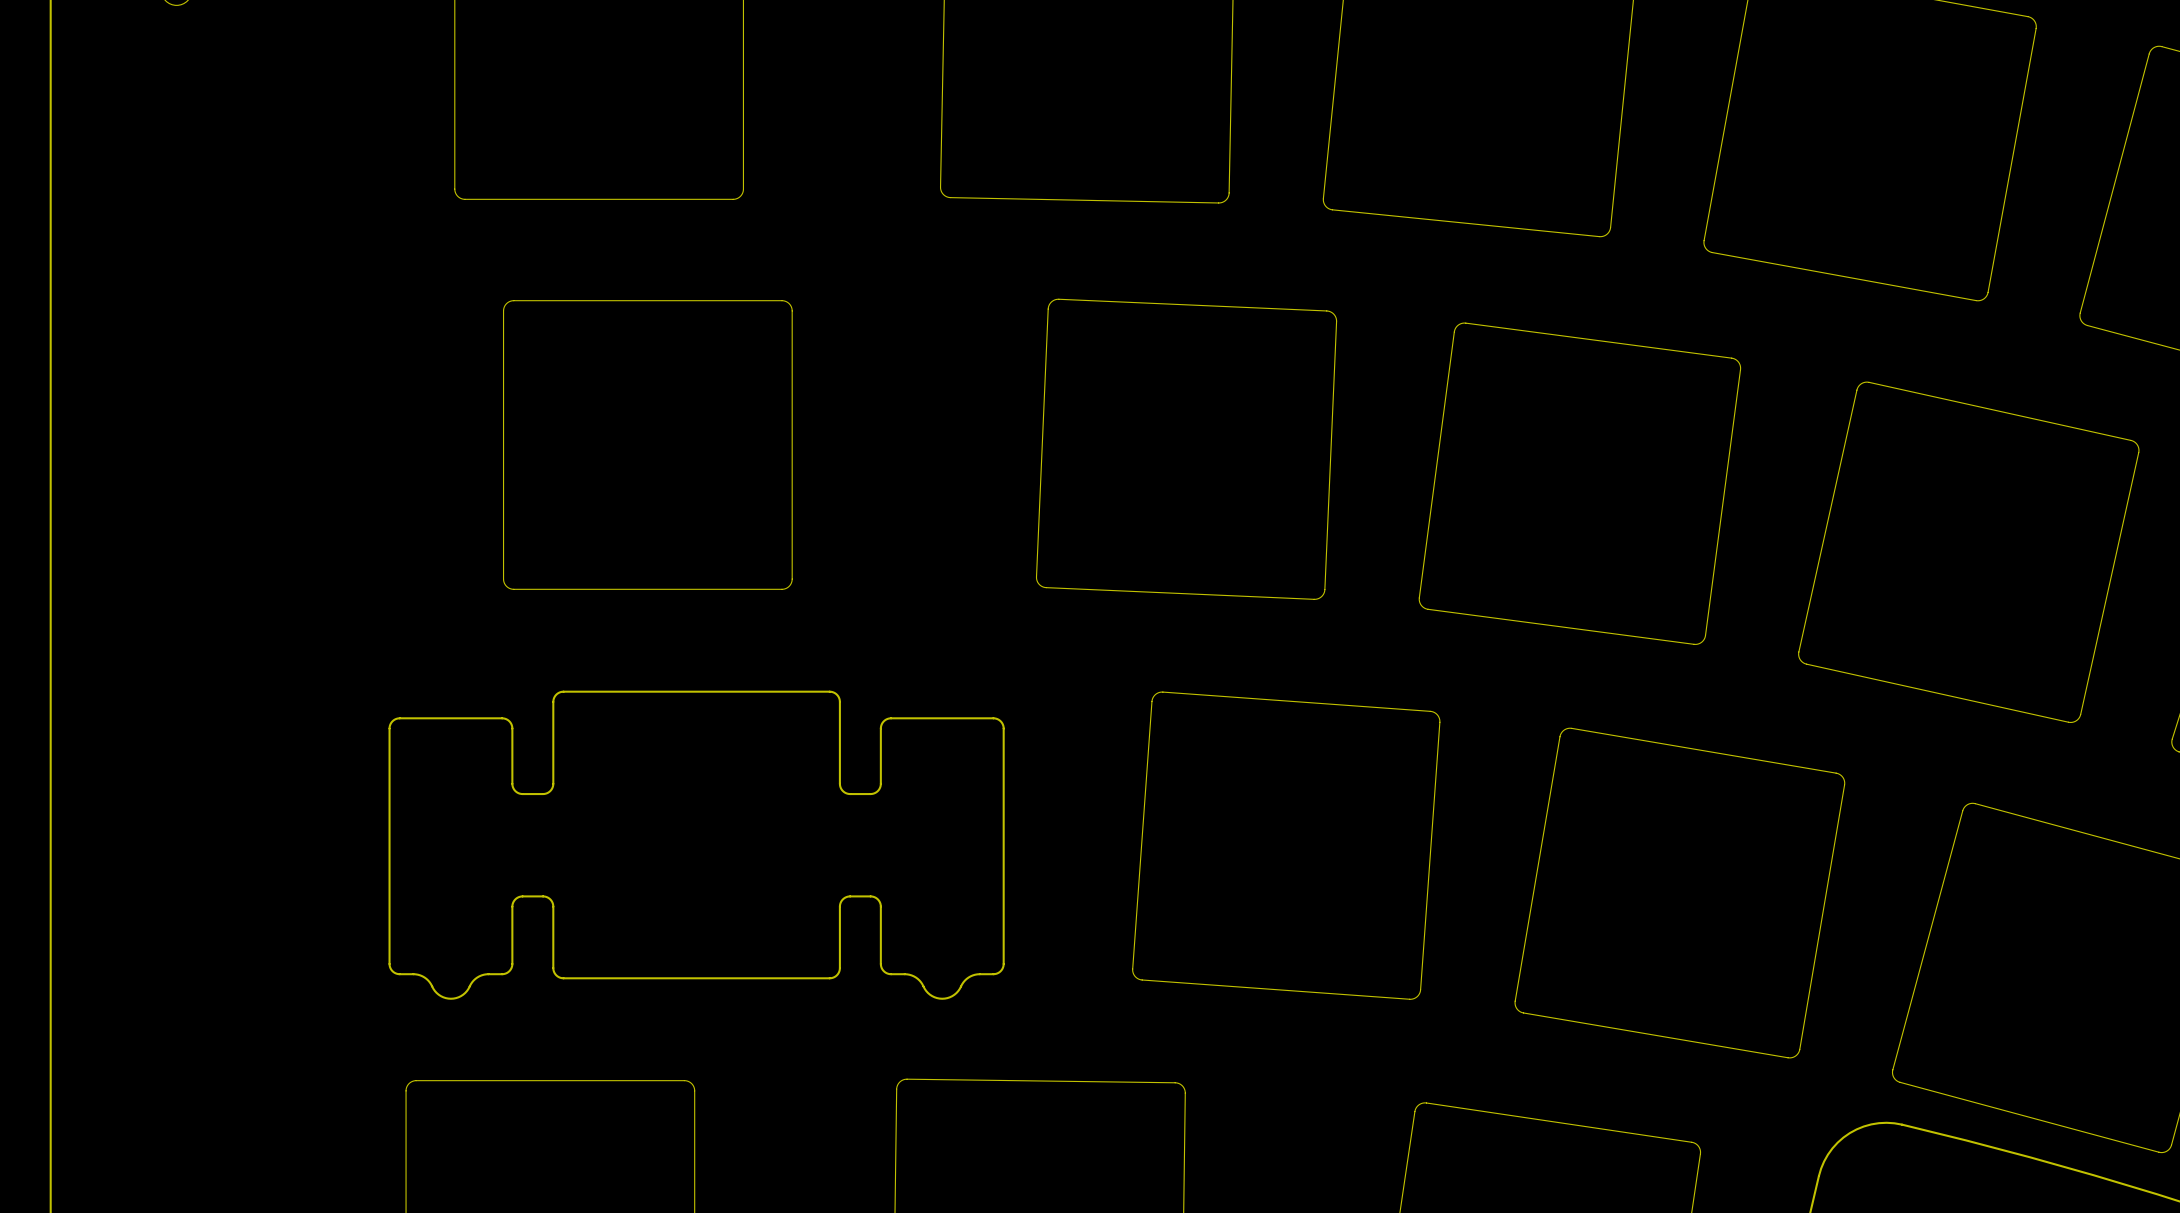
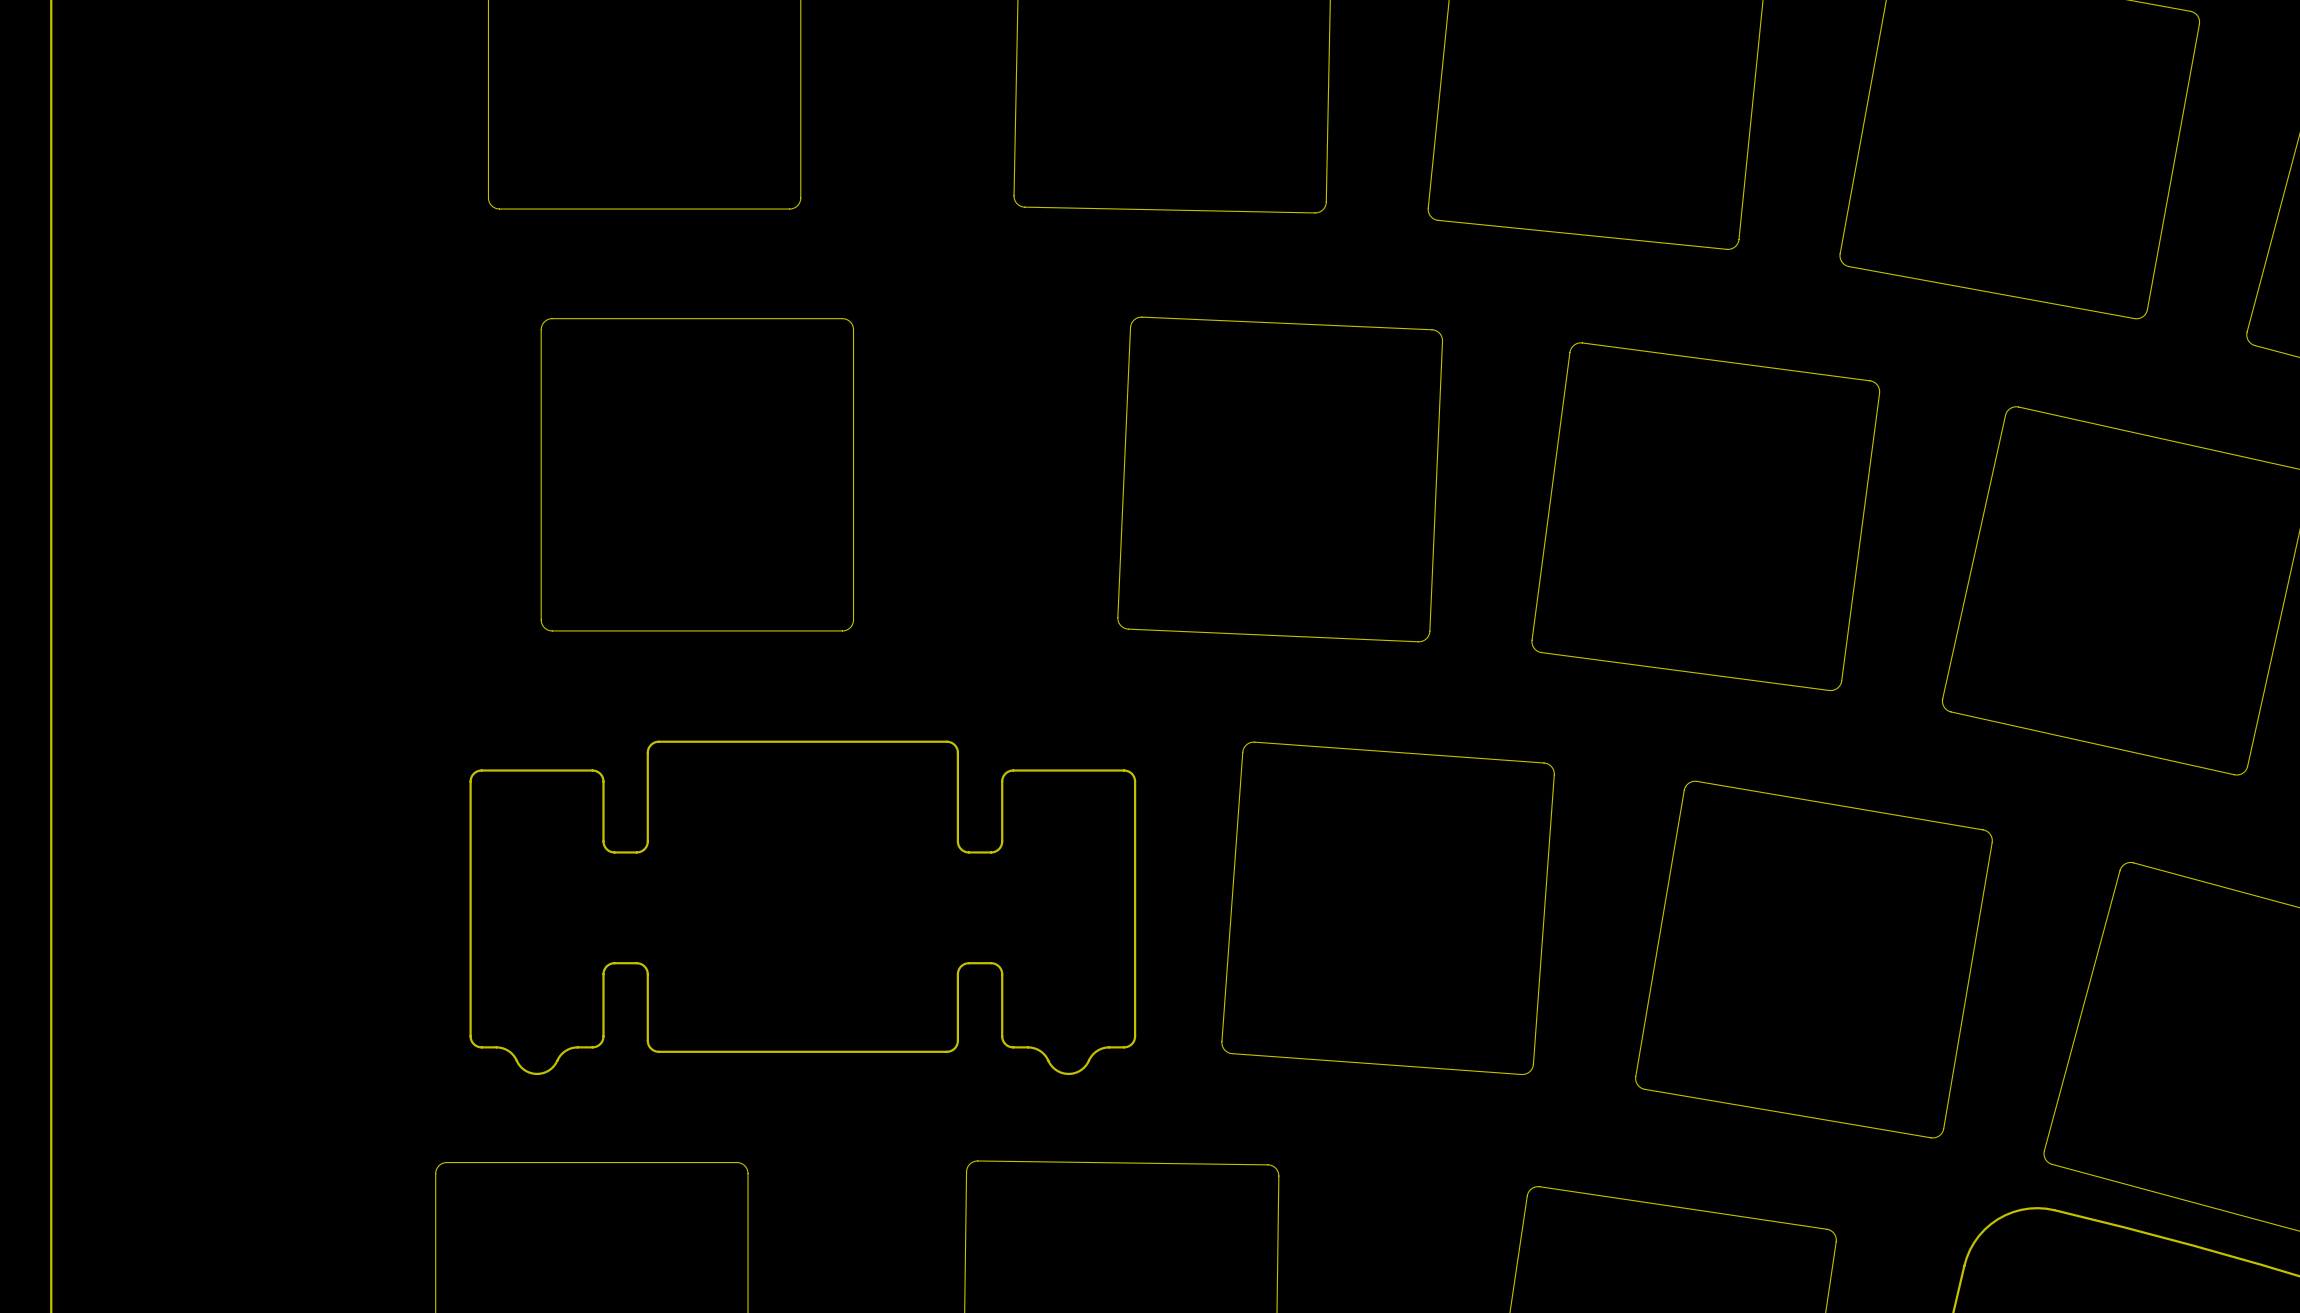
drawing position: (696, 845) -> (802, 907)

